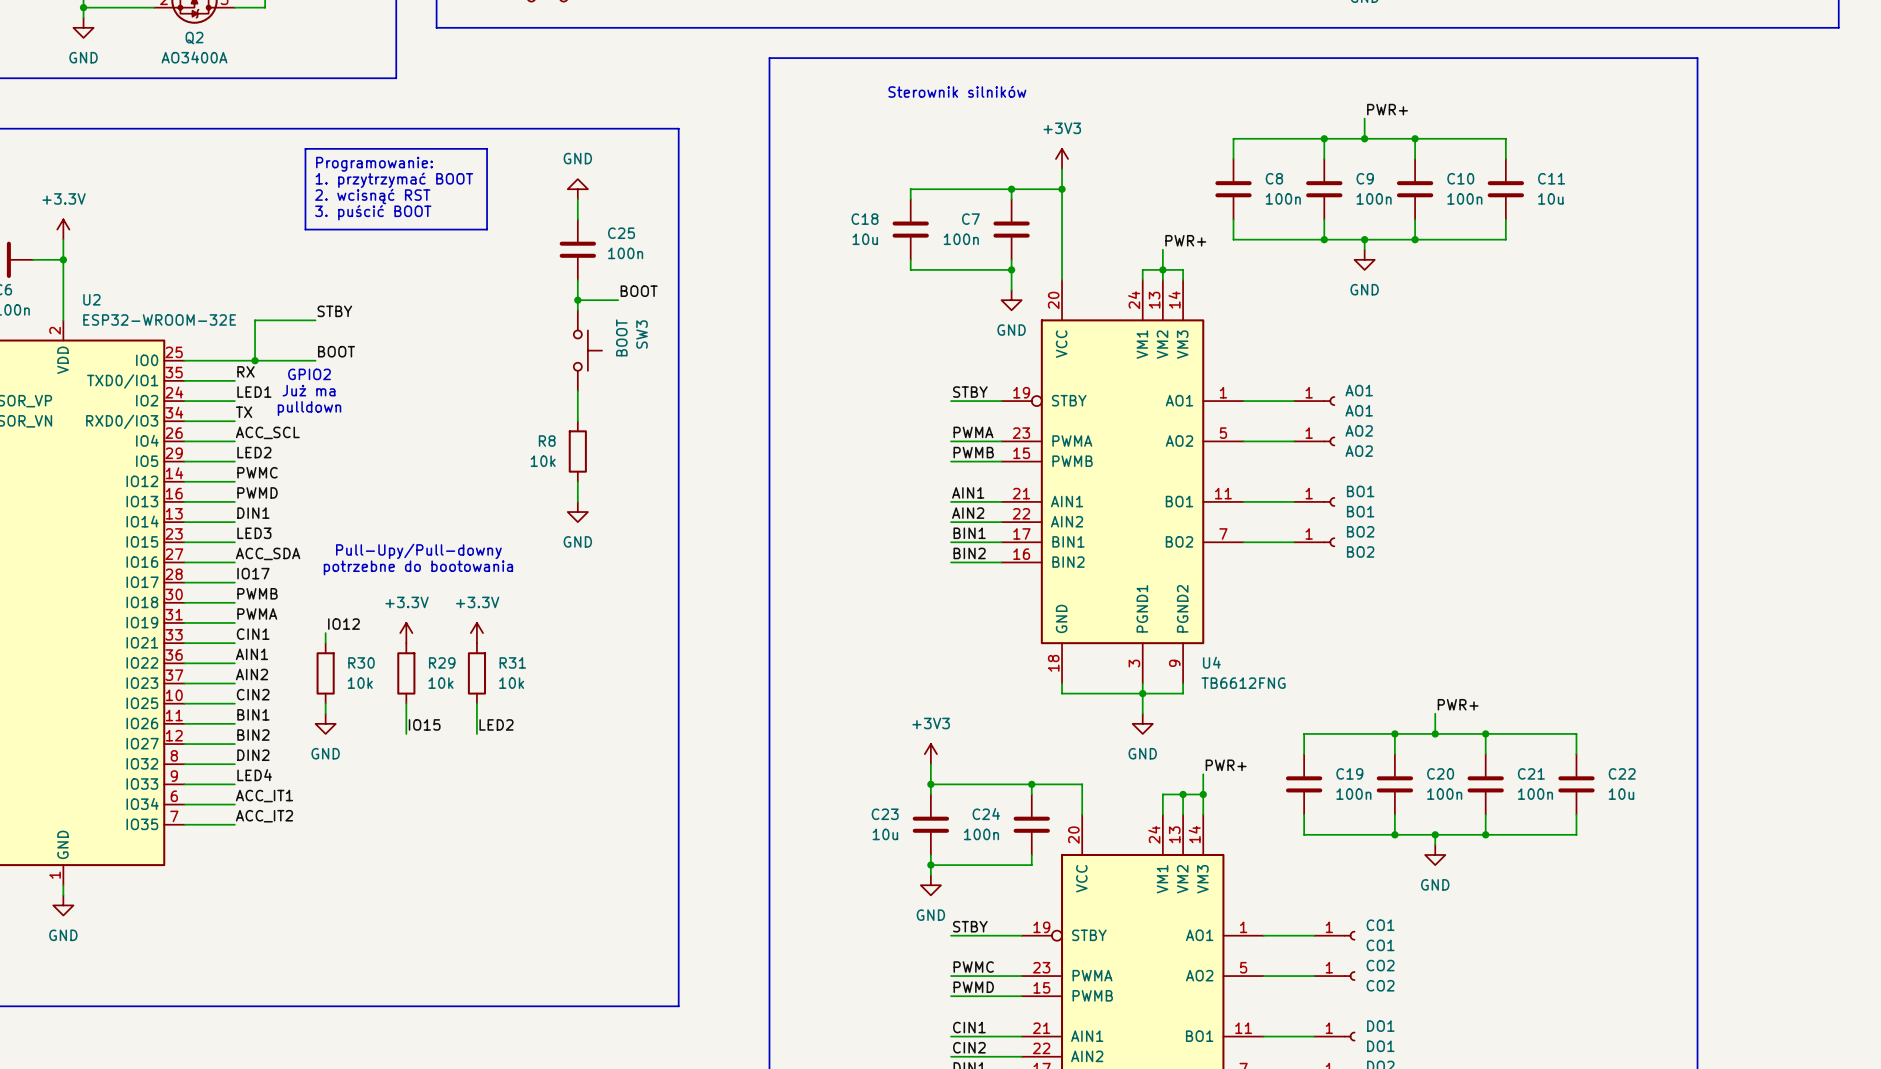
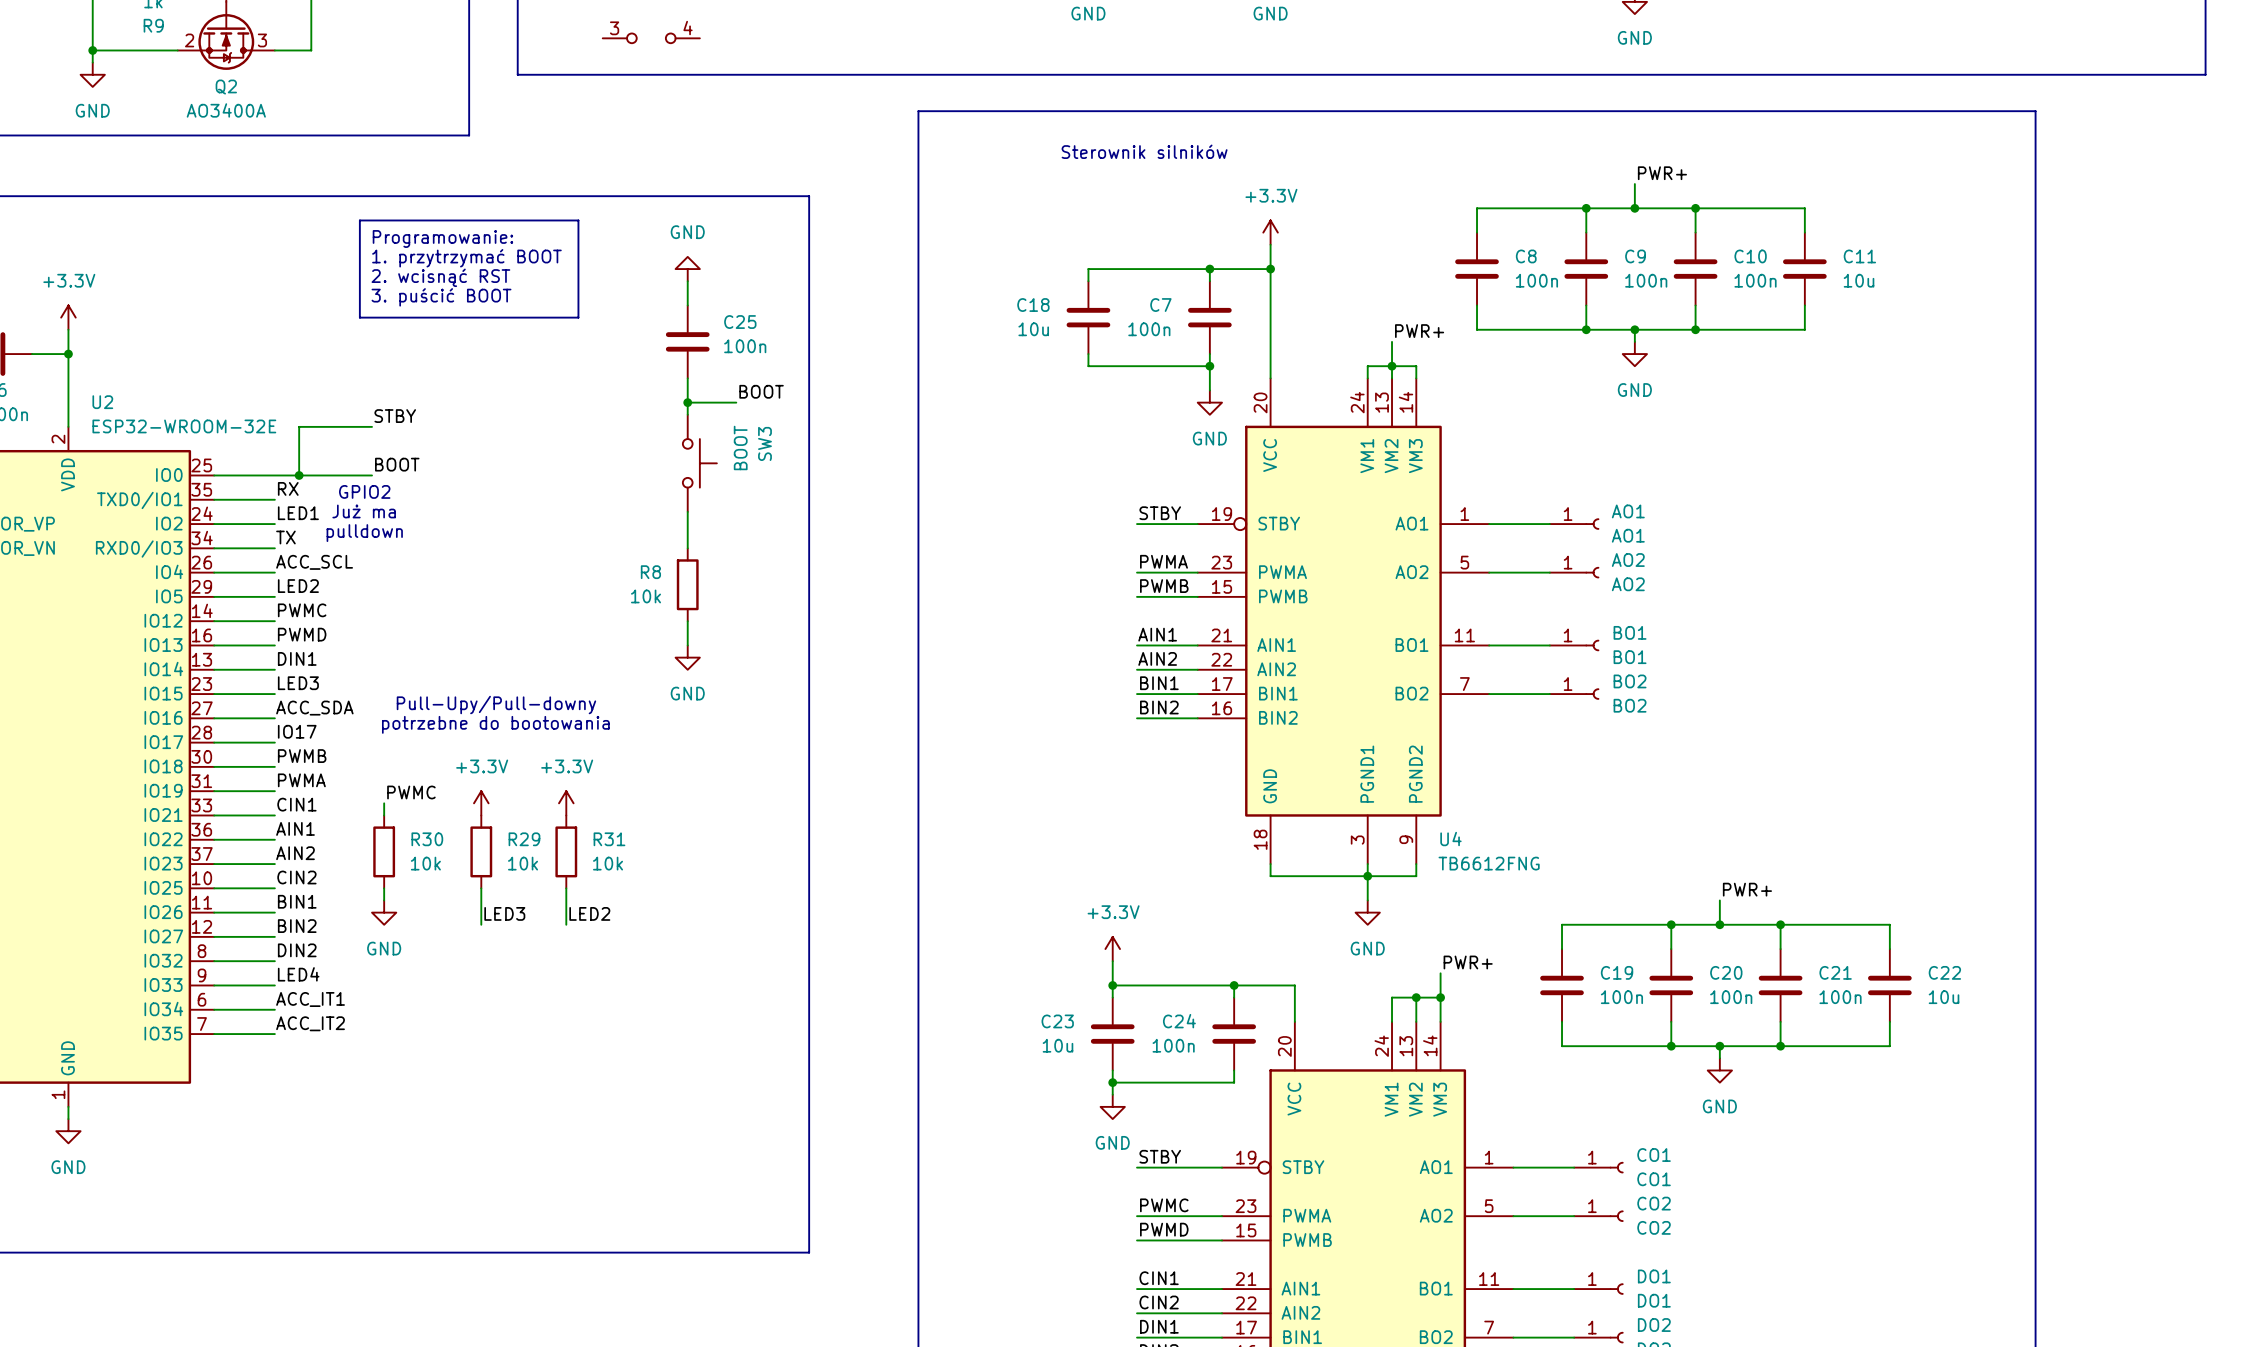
power symbol: +3V3 (1062, 158) -> +3.3V (1270, 232)
label: IO12 (343, 624) -> PWMC (411, 792)
label: IO15 (424, 724) -> LED3 (504, 913)
power symbol: +3V3 (930, 754) -> +3.3V (1112, 949)

